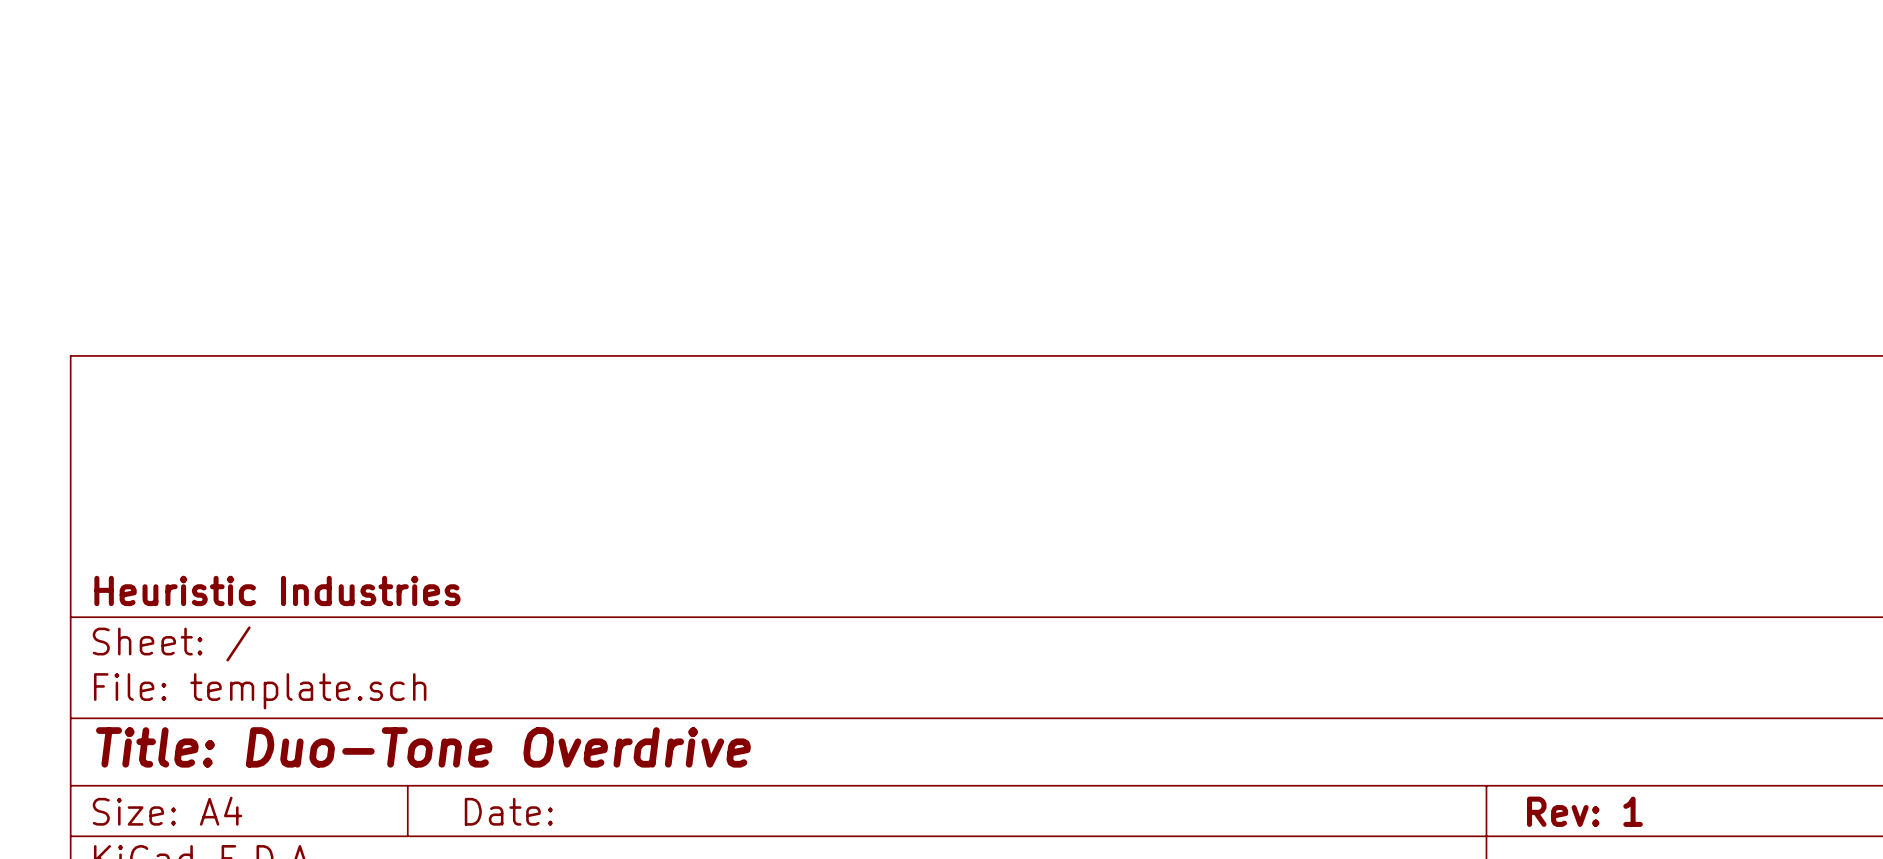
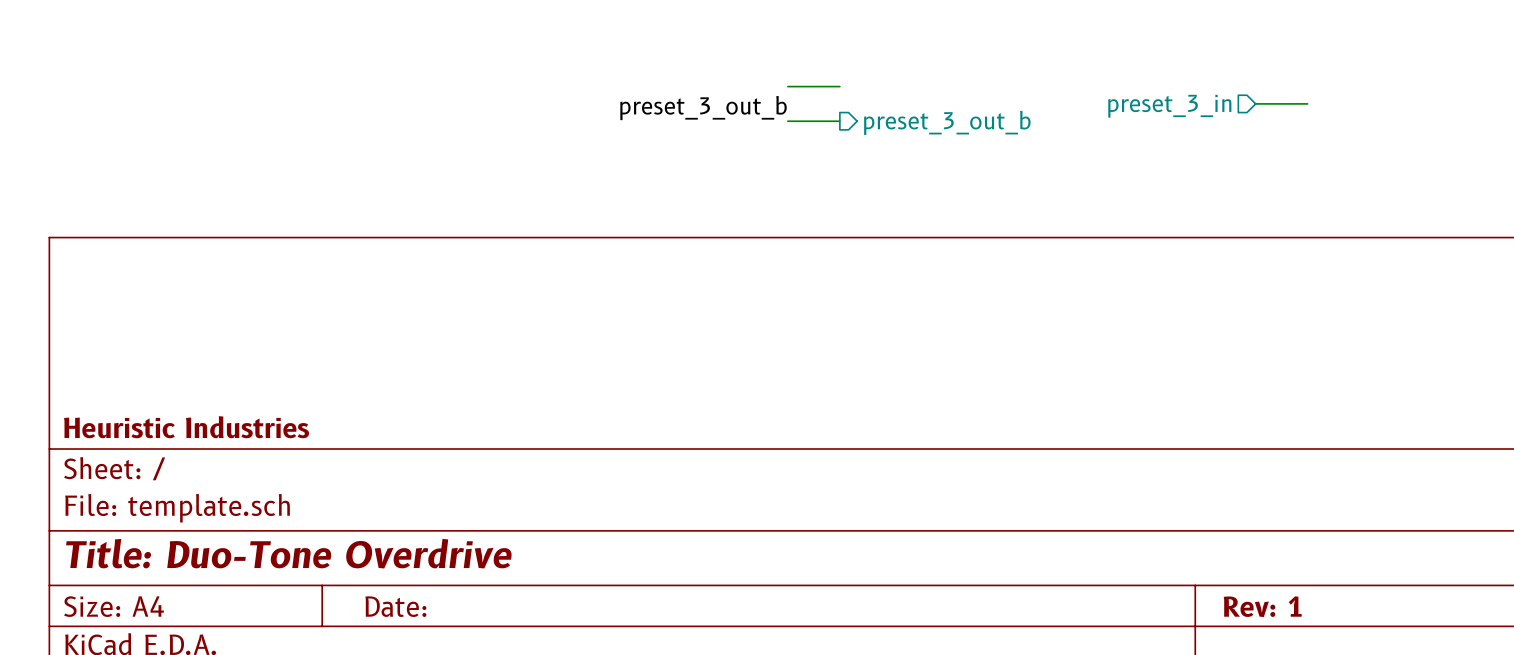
wire: none -> (787, 86) (839, 86)
wire: none -> (1255, 103) (1307, 103)
sheet pin: none -> preset_3_in (1169, 106)
label: none -> preset_3_out_b (703, 108)
wire: none -> (787, 121) (839, 121)
sheet pin: none -> preset_3_out_b (947, 122)

